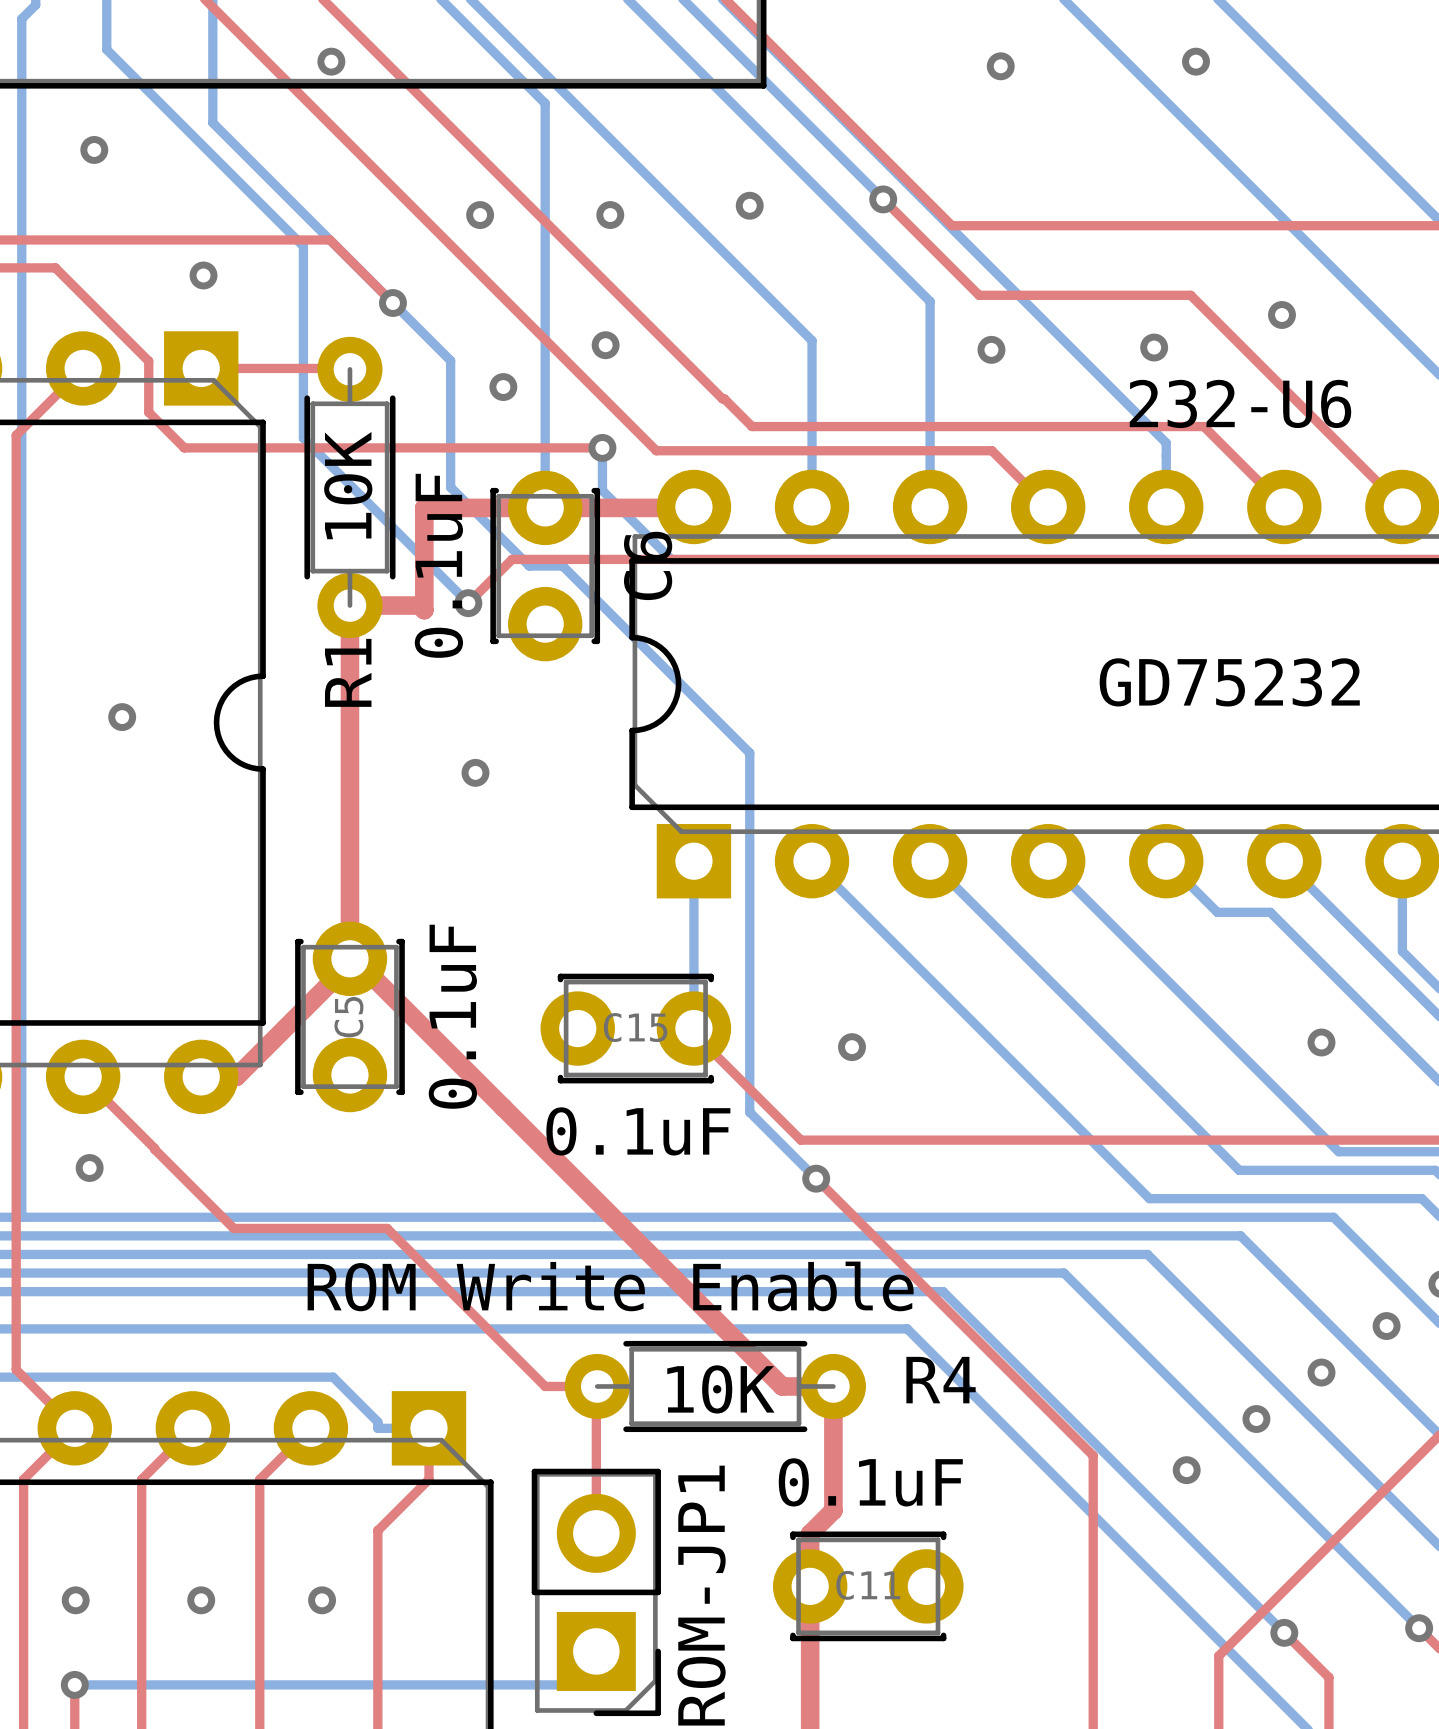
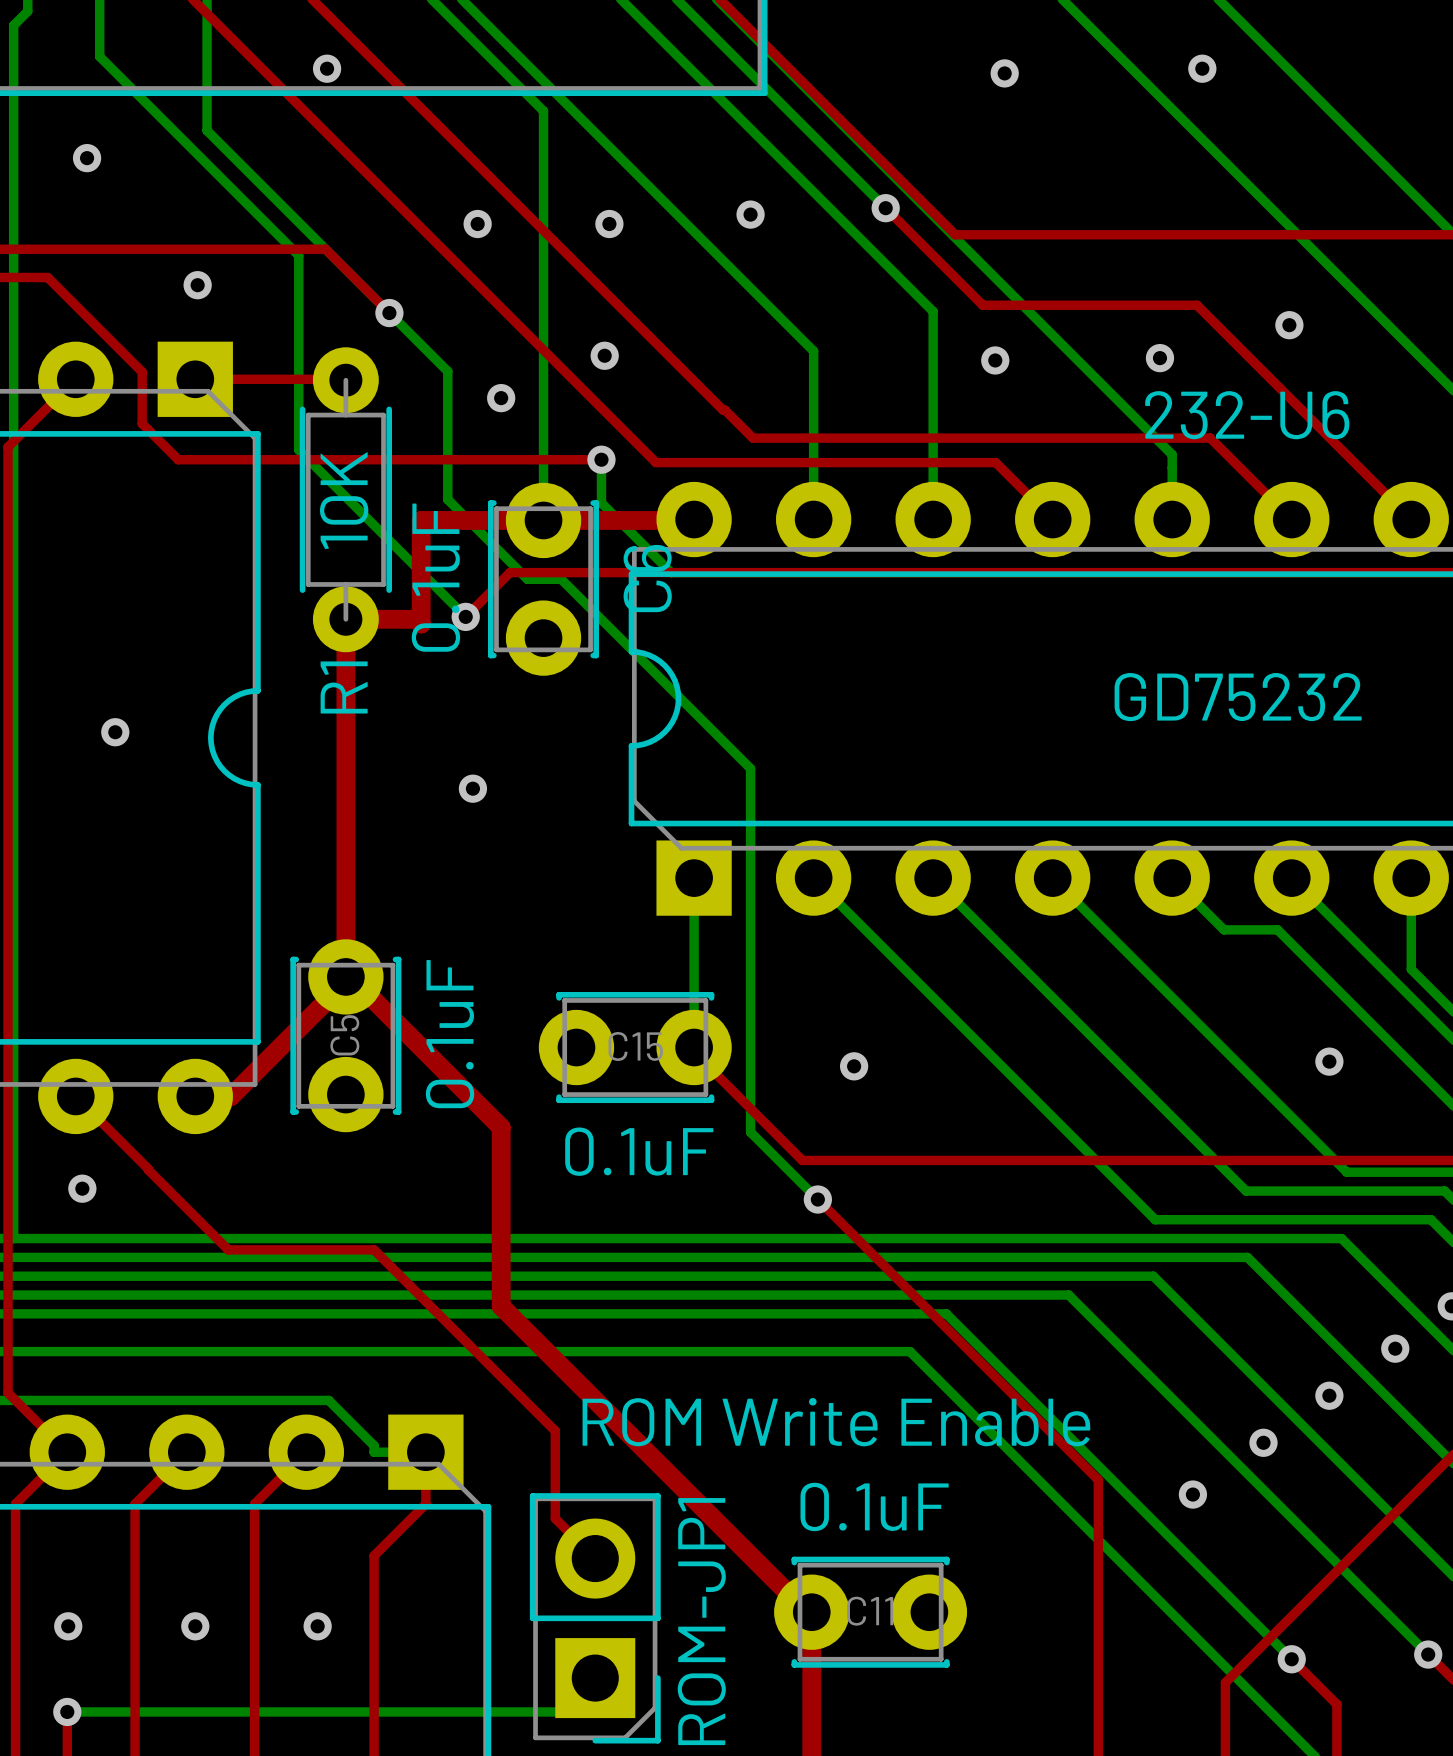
top track: (503, 1107) (782, 1386) (833, 1386) (833, 1510) (810, 1533) (810, 1586) -> (501, 1127) (501, 1306) (811, 1616)
top track: (377, 1228) (387, 1228) (545, 1386) (597, 1386) (596, 1533) -> (374, 1249) (555, 1431) (555, 1518) (595, 1558)
ROM-JP1 value position: ROM Write Enable (610, 1286) -> ROM Write Enable (836, 1422)
R4: 10K (715, 1386) -> none

